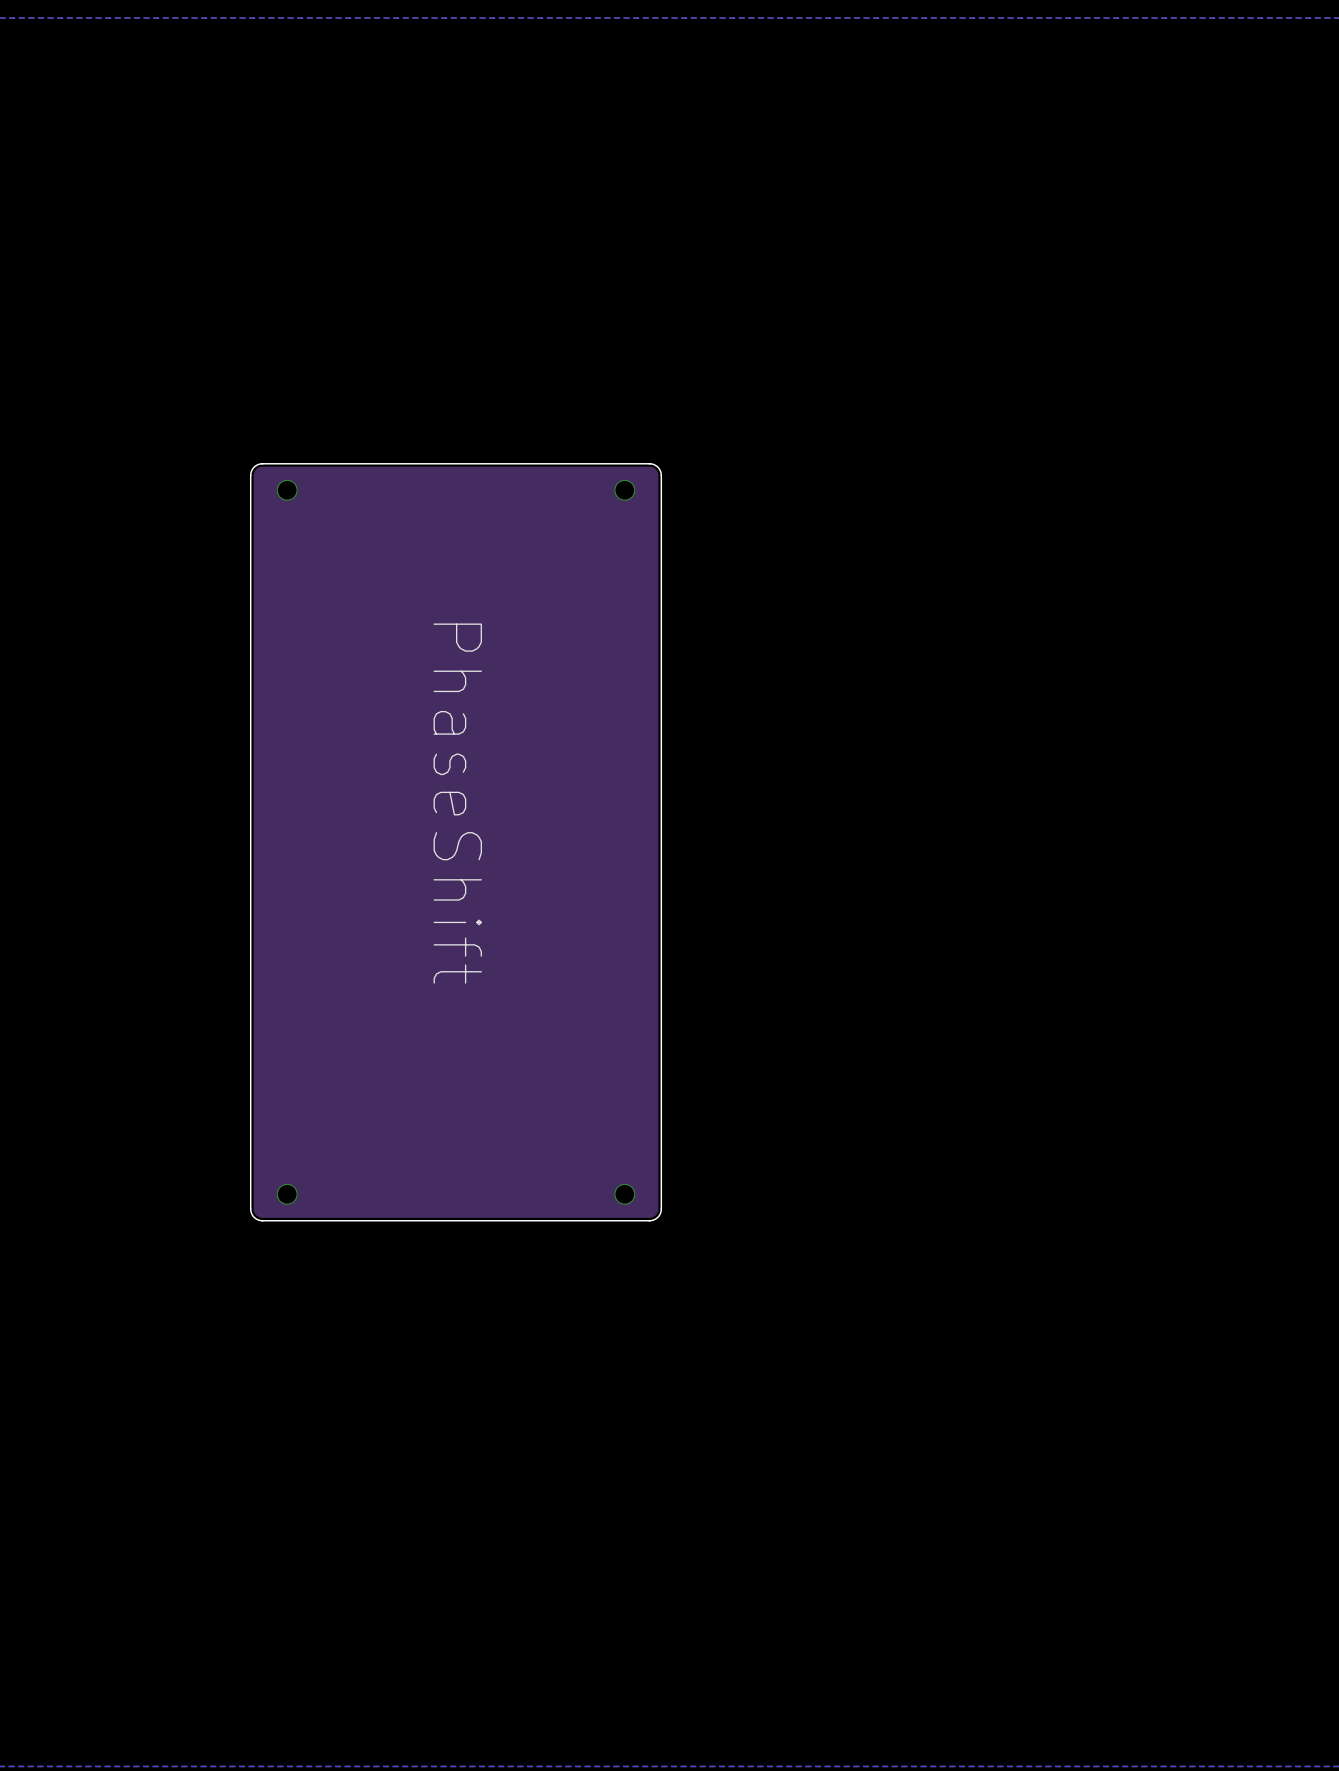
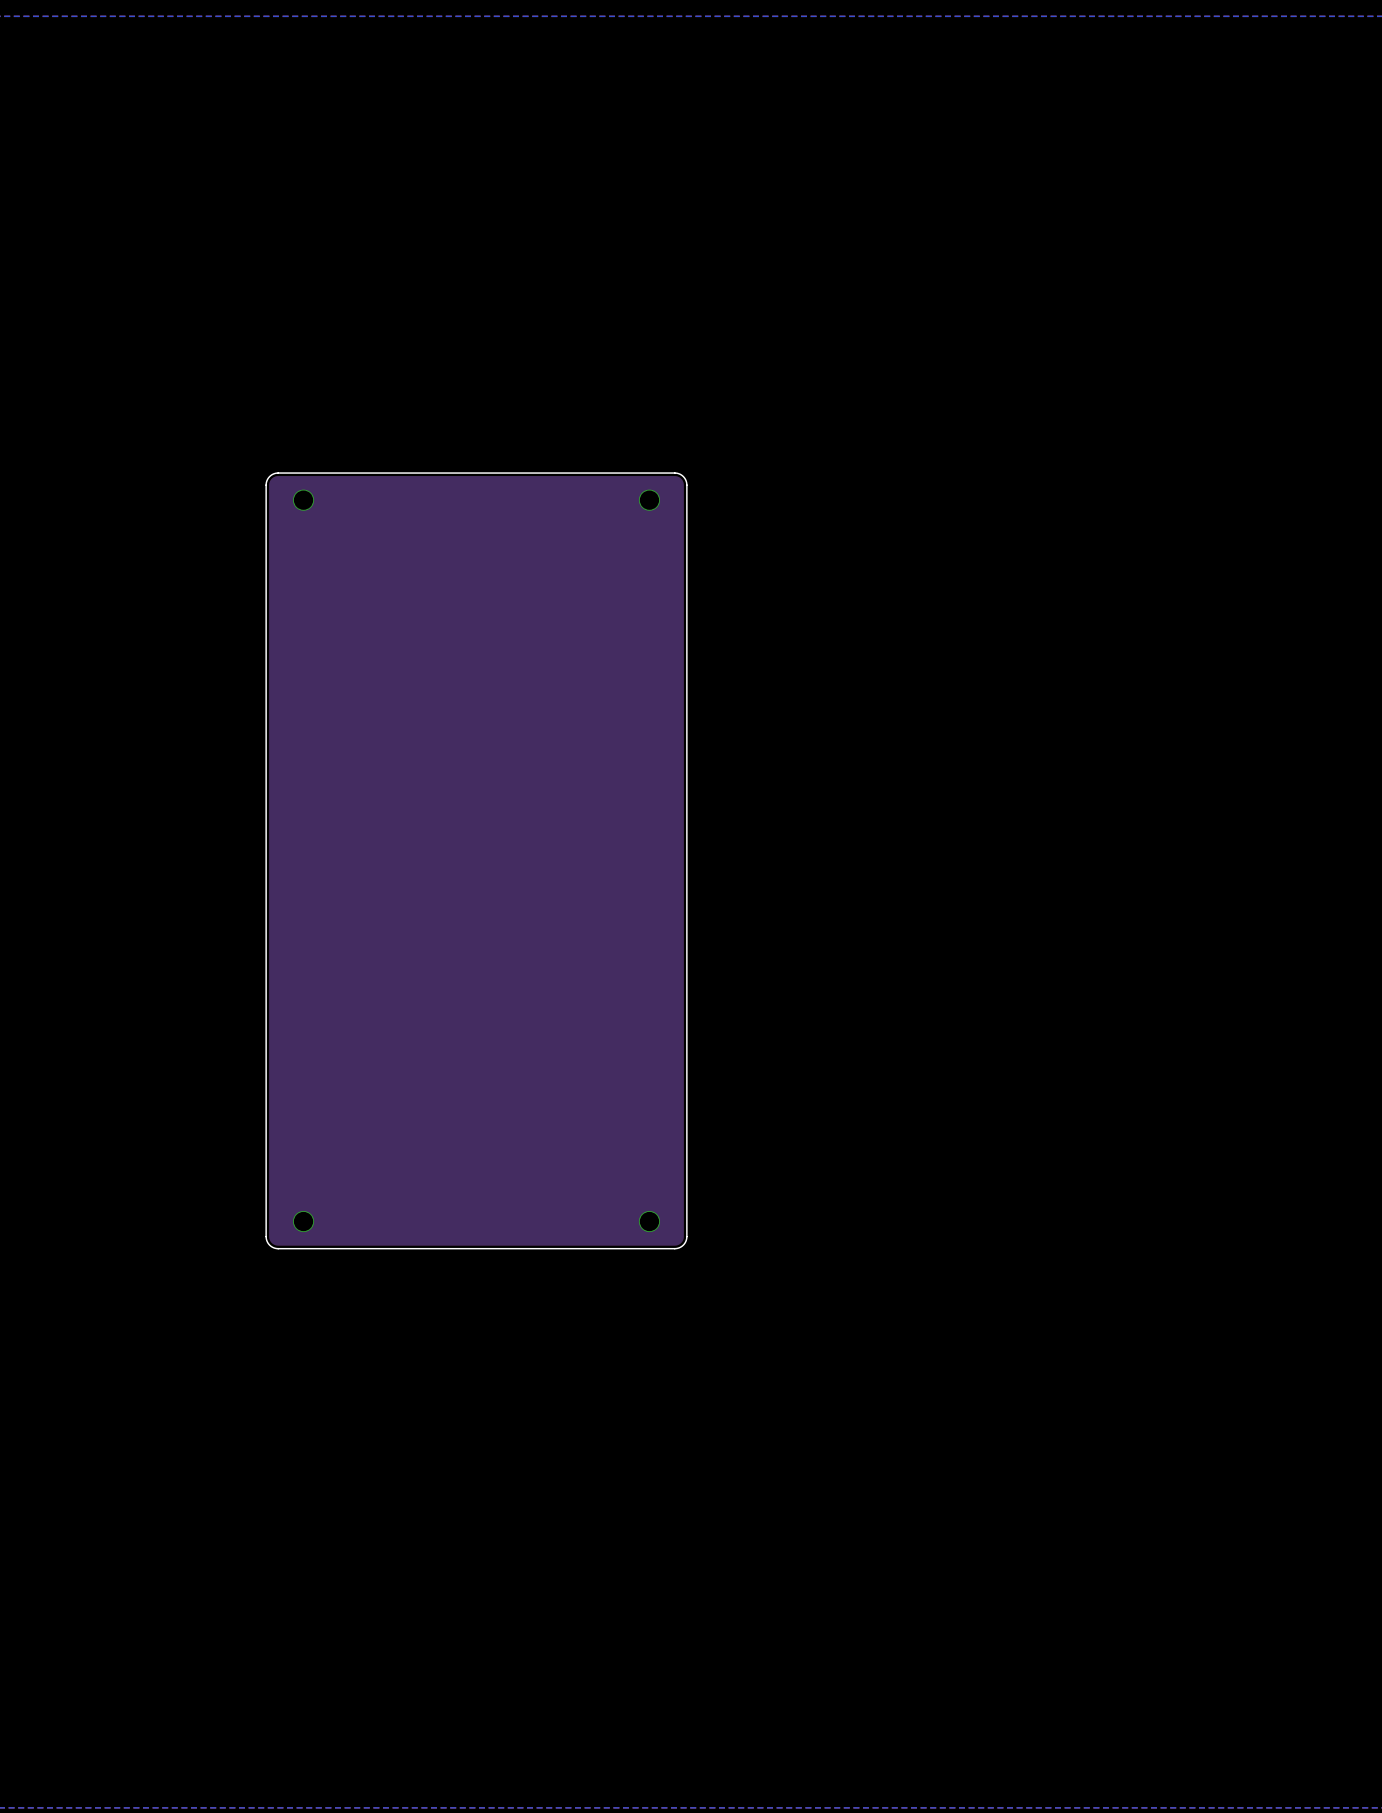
text: PhaseShift (457, 803) -> none

